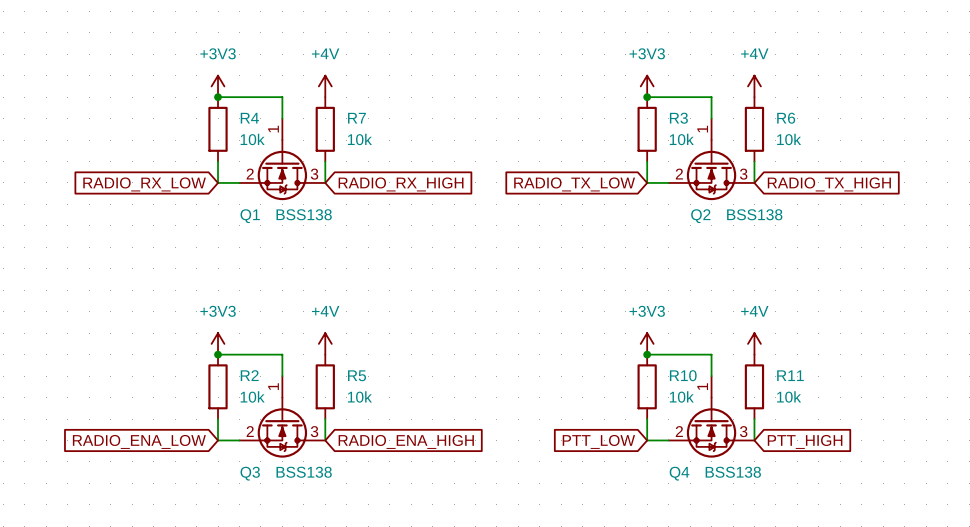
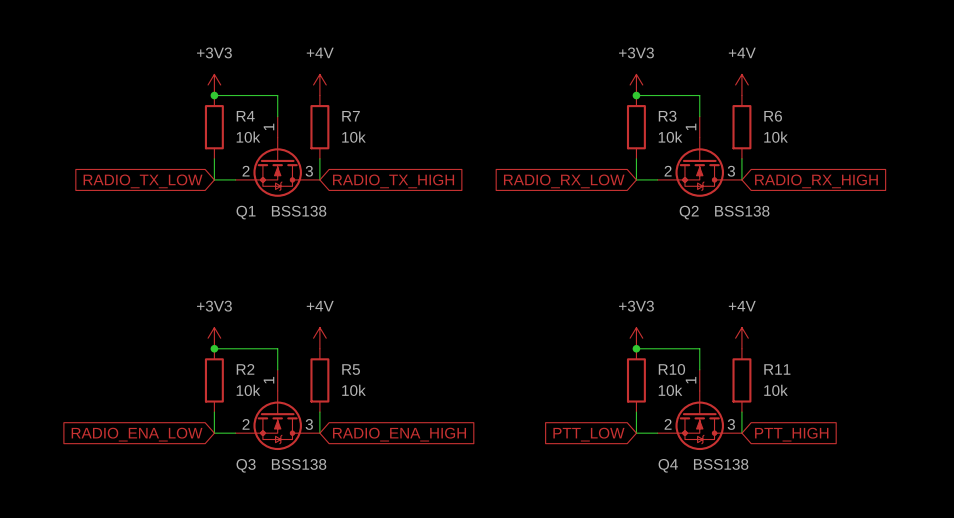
global label: RADIO_RX_LOW (144, 184) -> RADIO_TX_LOW (143, 181)
global label: RADIO_RX_HIGH (401, 184) -> RADIO_TX_HIGH (393, 181)
global label: RADIO_TX_LOW (574, 184) -> RADIO_RX_LOW (564, 181)
global label: RADIO_TX_HIGH (829, 184) -> RADIO_RX_HIGH (816, 181)

